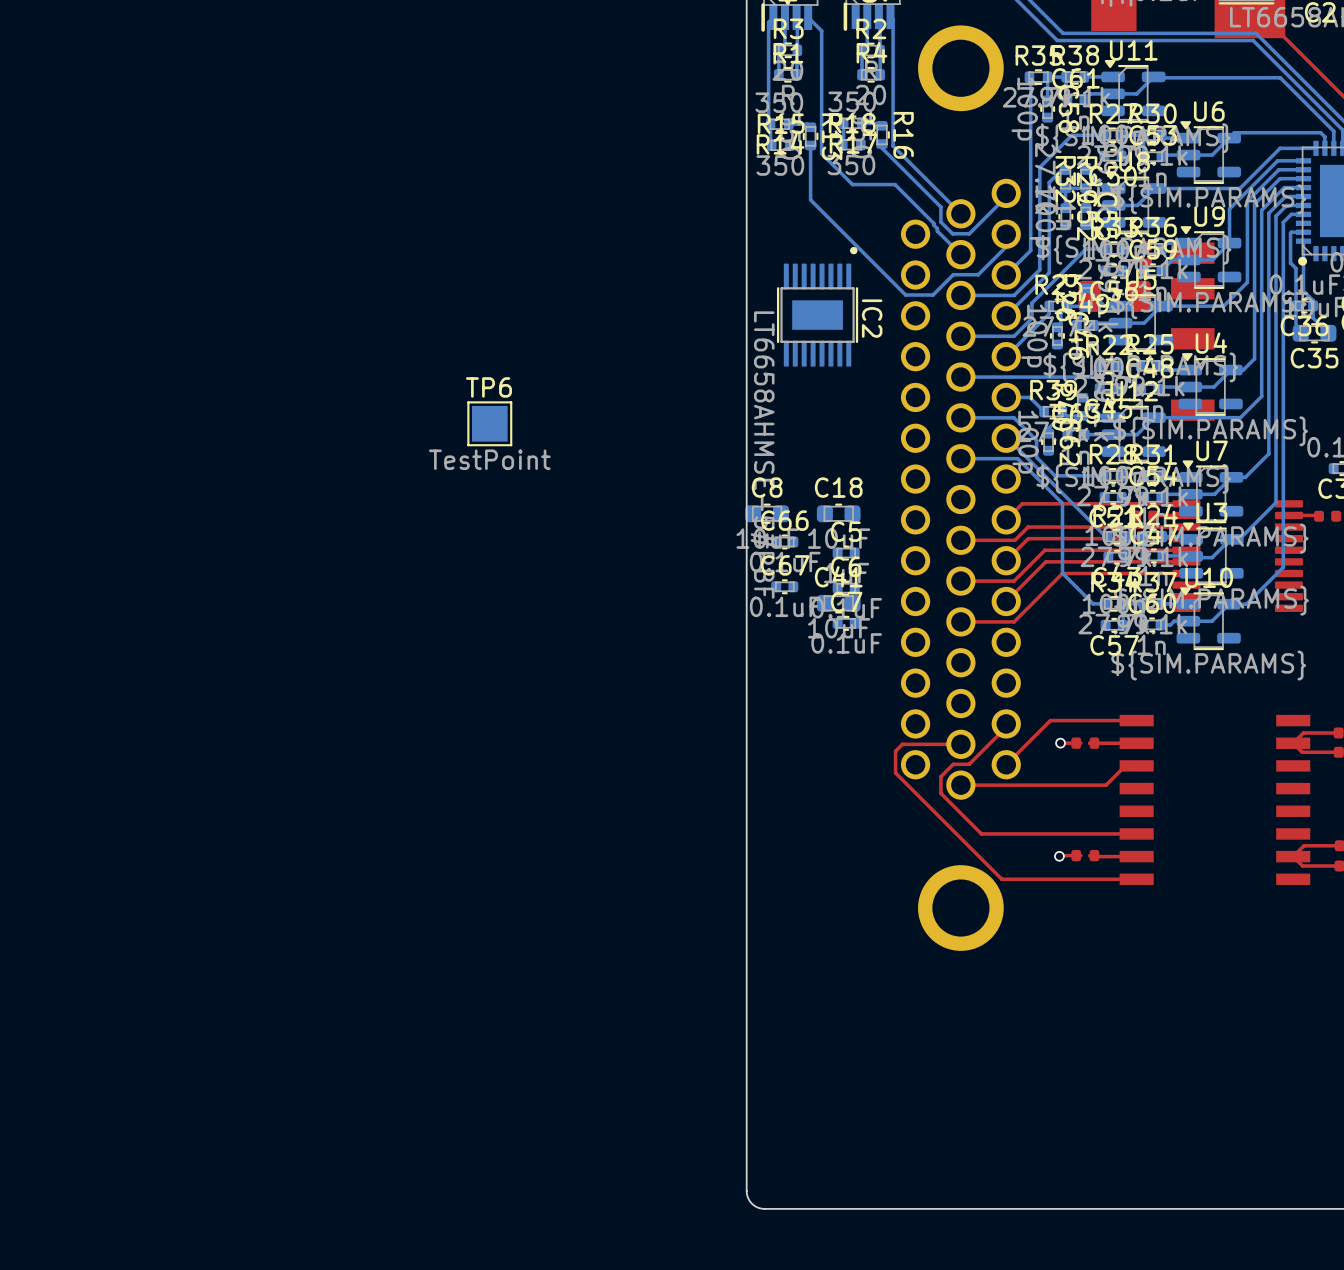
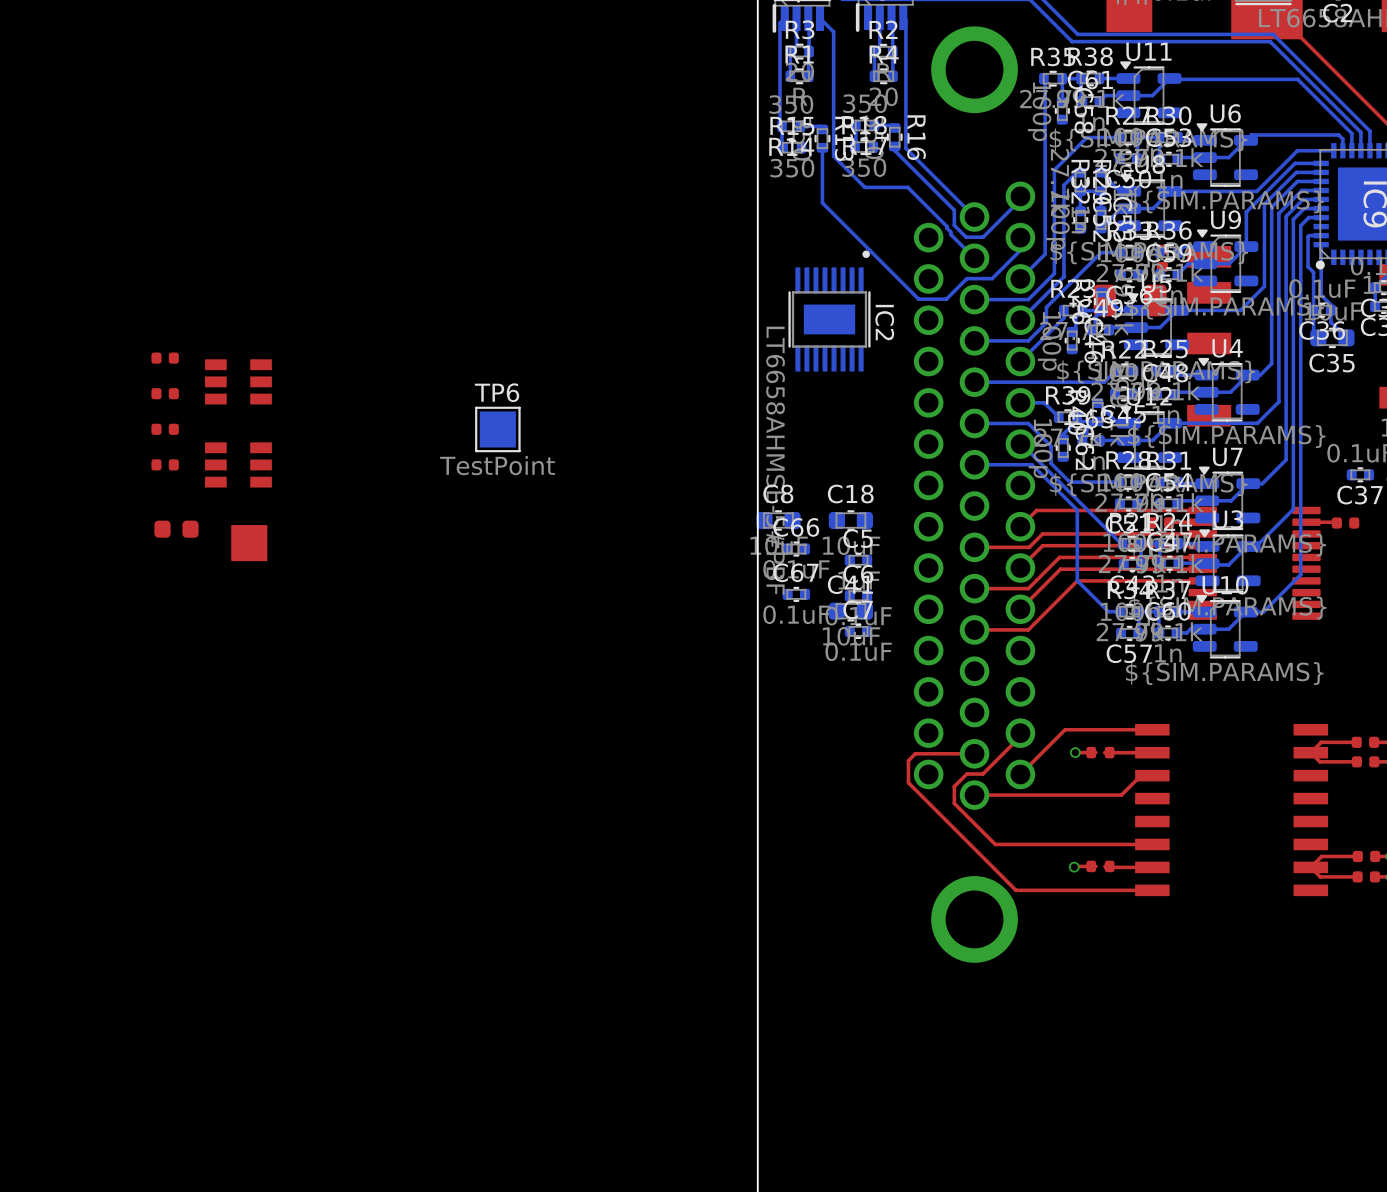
part: none -> (165, 358)
part: none -> (238, 381)
part: none -> (165, 393)
part: none -> (165, 429)
part: none -> (165, 464)
part: none -> (238, 464)
part: none -> (176, 529)
part: none -> (249, 543)

